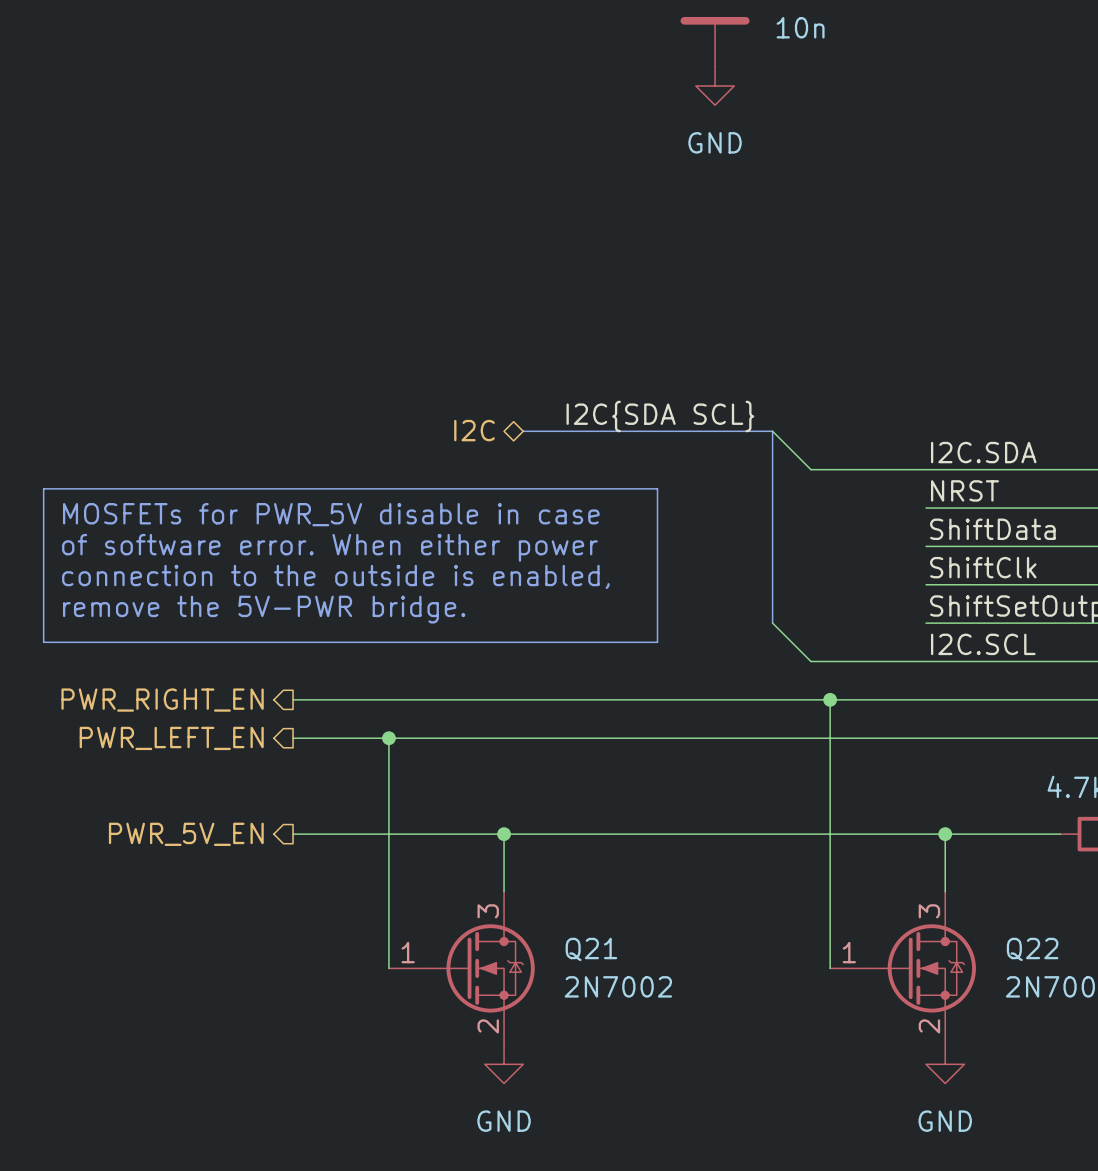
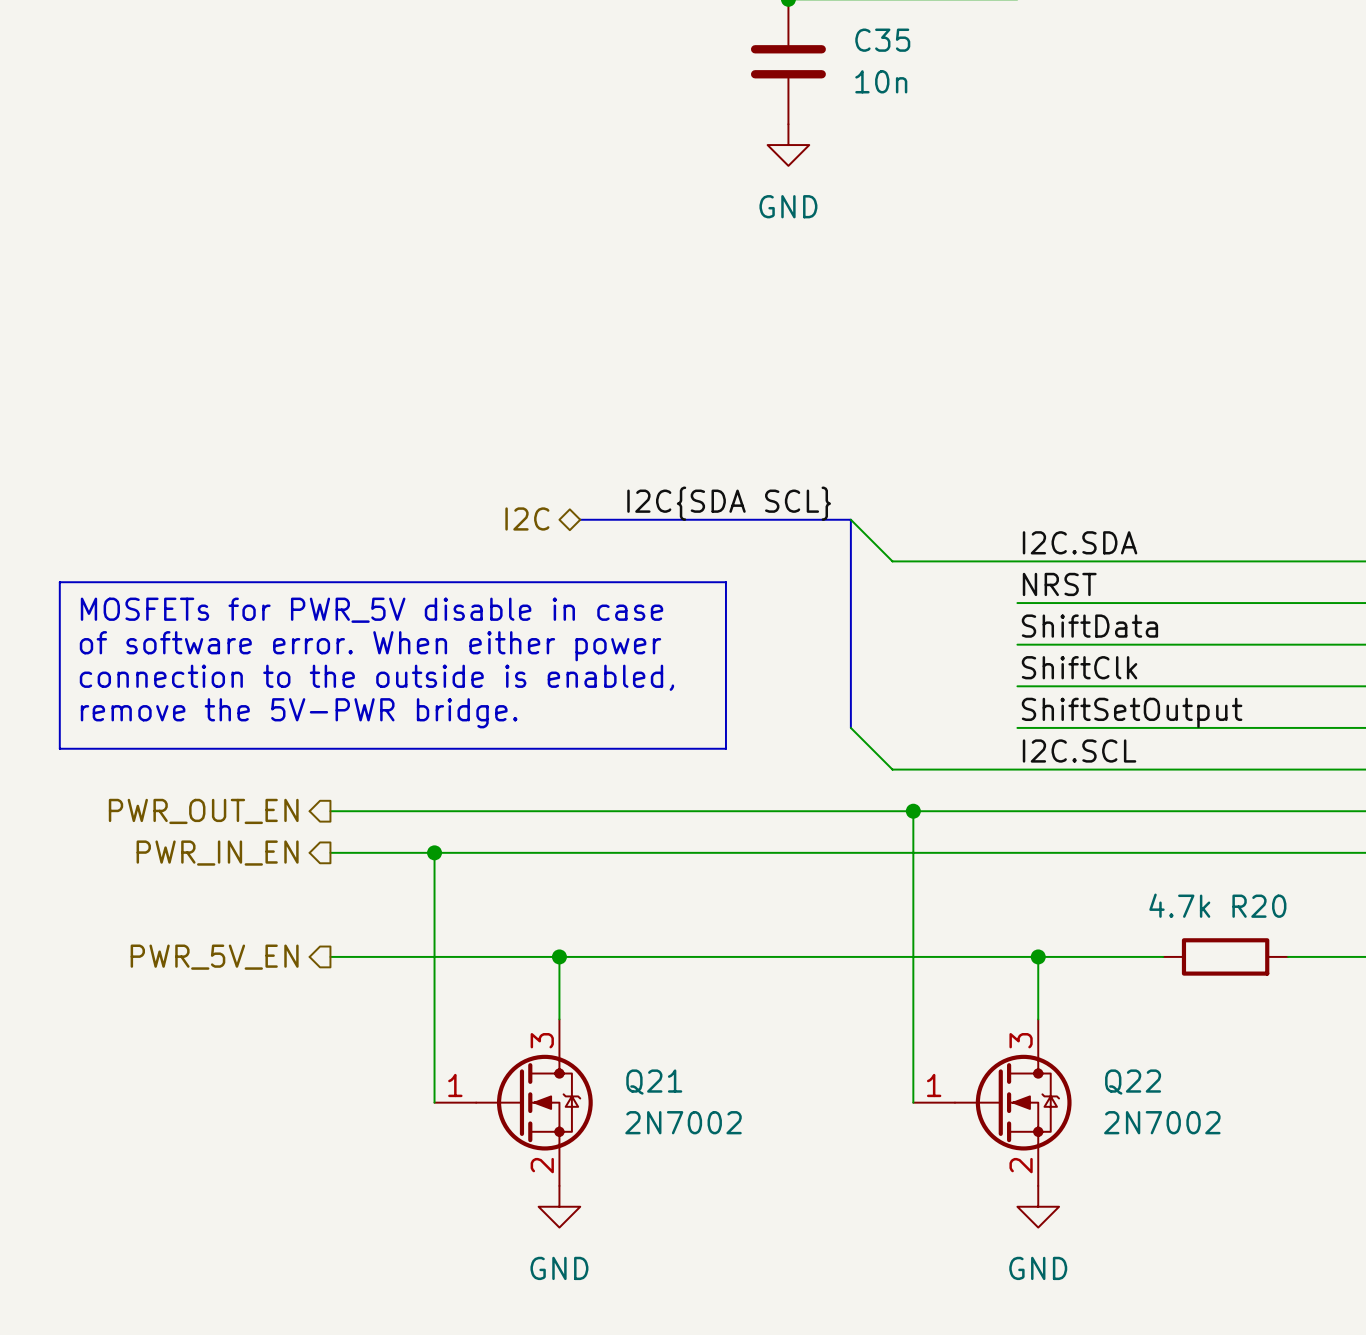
hierarchical label: PWR_RIGHT_EN (162, 700) -> PWR_OUT_EN (203, 811)
hierarchical label: PWR_LEFT_EN (171, 738) -> PWR_IN_EN (217, 853)

